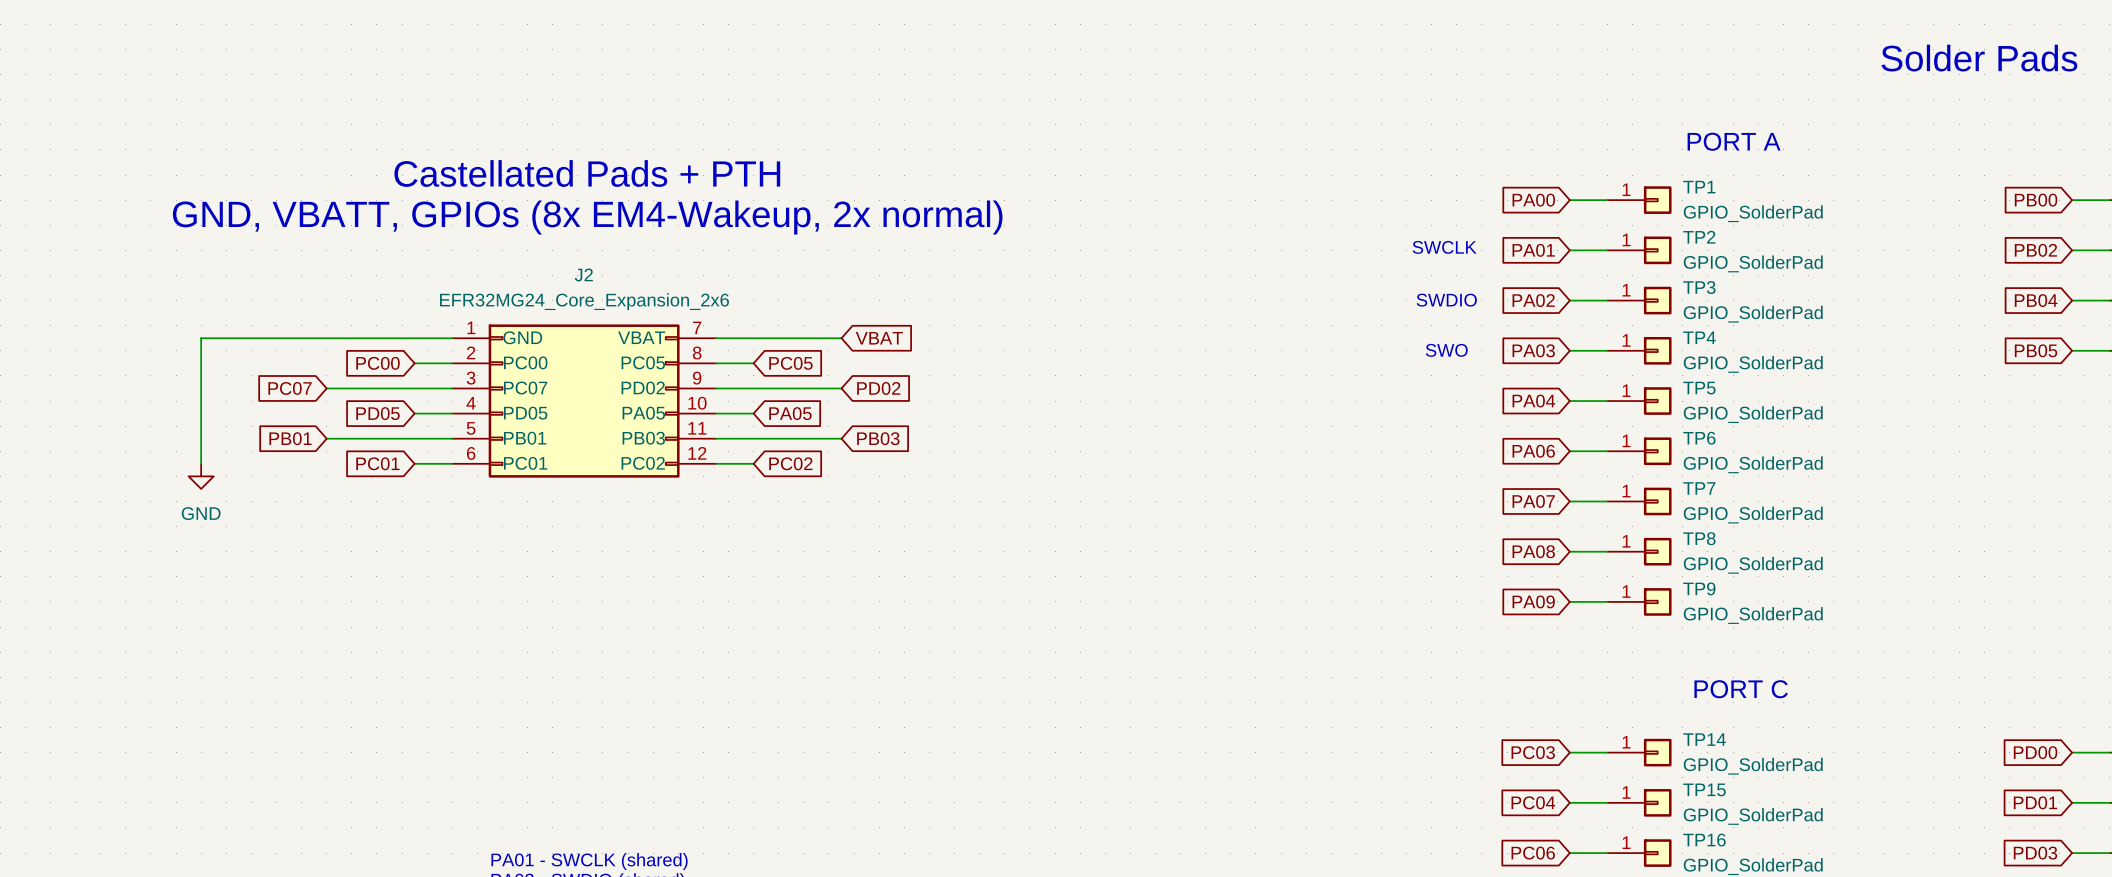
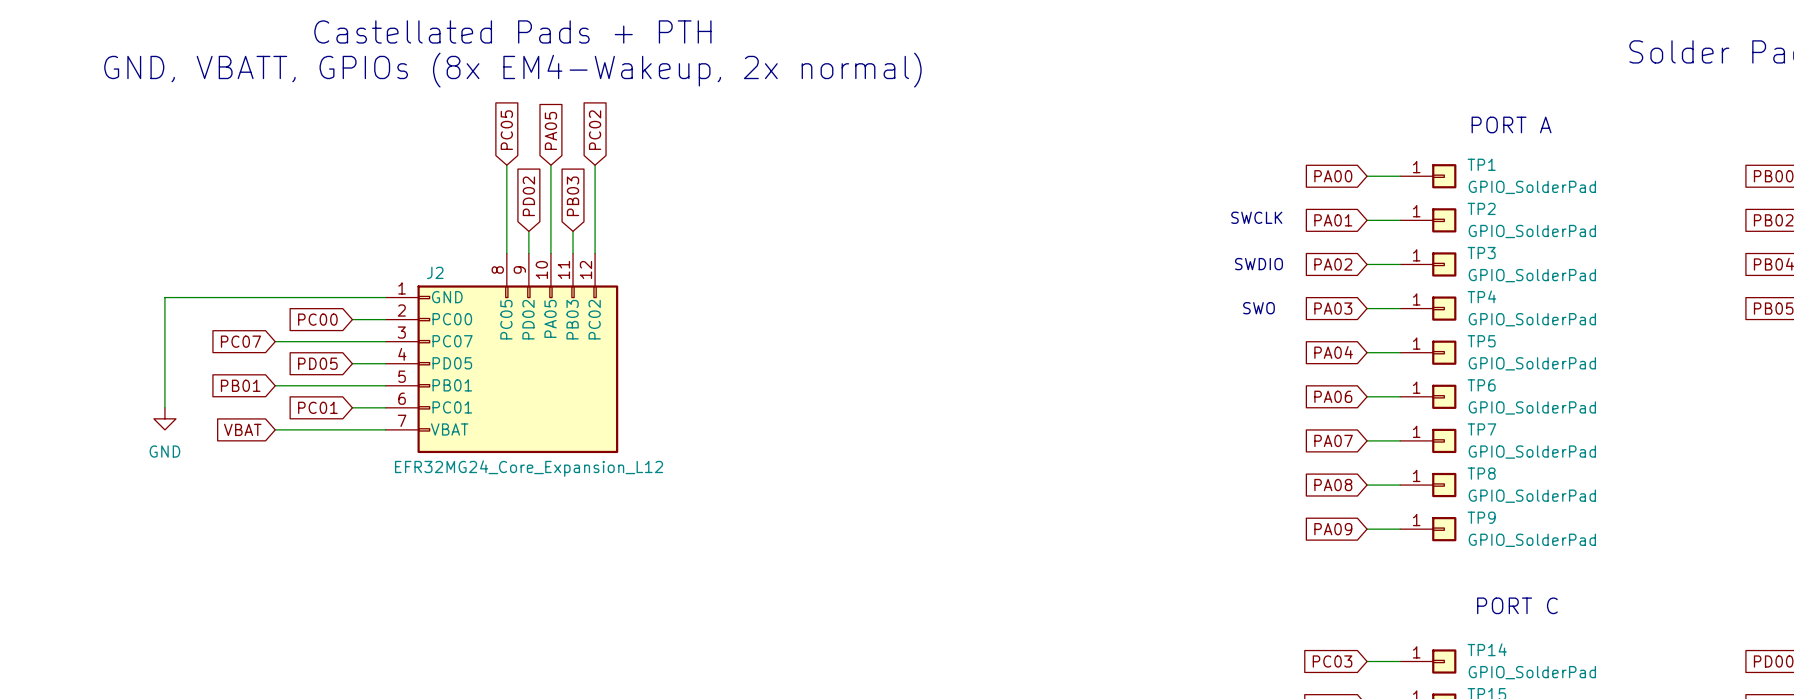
global label: none -> PA05 (550, 130)
global label: none -> PC02 (595, 130)
text position: Castellated Pads + PTH (587, 173) -> Castellated Pads + PTH (512, 31)
wire: none -> (506, 165) (506, 253)
wire: none -> (550, 165) (550, 253)
wire: none -> (595, 165) (595, 253)
text position: GND, VBATT, GPIOs (8x EM4-Wakeup, 2x normal) (587, 217) -> GND, VBATT, GPIOs (8x EM4-Wakeup, 2x normal) (512, 70)
global label: none -> PD02 (528, 196)
global label: none -> PB03 (573, 196)
wire: none -> (528, 231) (528, 253)
wire: none -> (573, 231) (573, 253)
J2 name position: J2 (583, 274) -> J2 (435, 272)
J2 value: EFR32MG24_Core_Expansion_2x6 (584, 301) -> EFR32MG24_Core_Expansion_L12 (529, 468)
J2 symbol: [452, 324, 716, 478] -> [385, 253, 619, 454]
wire: (715, 338) (841, 338) -> none
global label: VBAT (879, 338) -> none
wire: (715, 363) (753, 363) -> none
global label rotation: 0° (790, 363) -> 90° counterclockwise (506, 130)
global label position: PC05 (790, 363) -> PC05 (506, 130)
wire: (715, 388) (841, 388) -> none
global label: PD02 (878, 388) -> none
wire: (715, 413) (753, 413) -> none
global label: PA05 (790, 413) -> none
wire: (715, 438) (841, 438) -> none
global label: PB03 (878, 438) -> none
wire: (715, 463) (753, 463) -> none
global label: PC02 (790, 463) -> none
global label: none -> VBAT (242, 429)
wire: none -> (275, 429) (385, 429)

